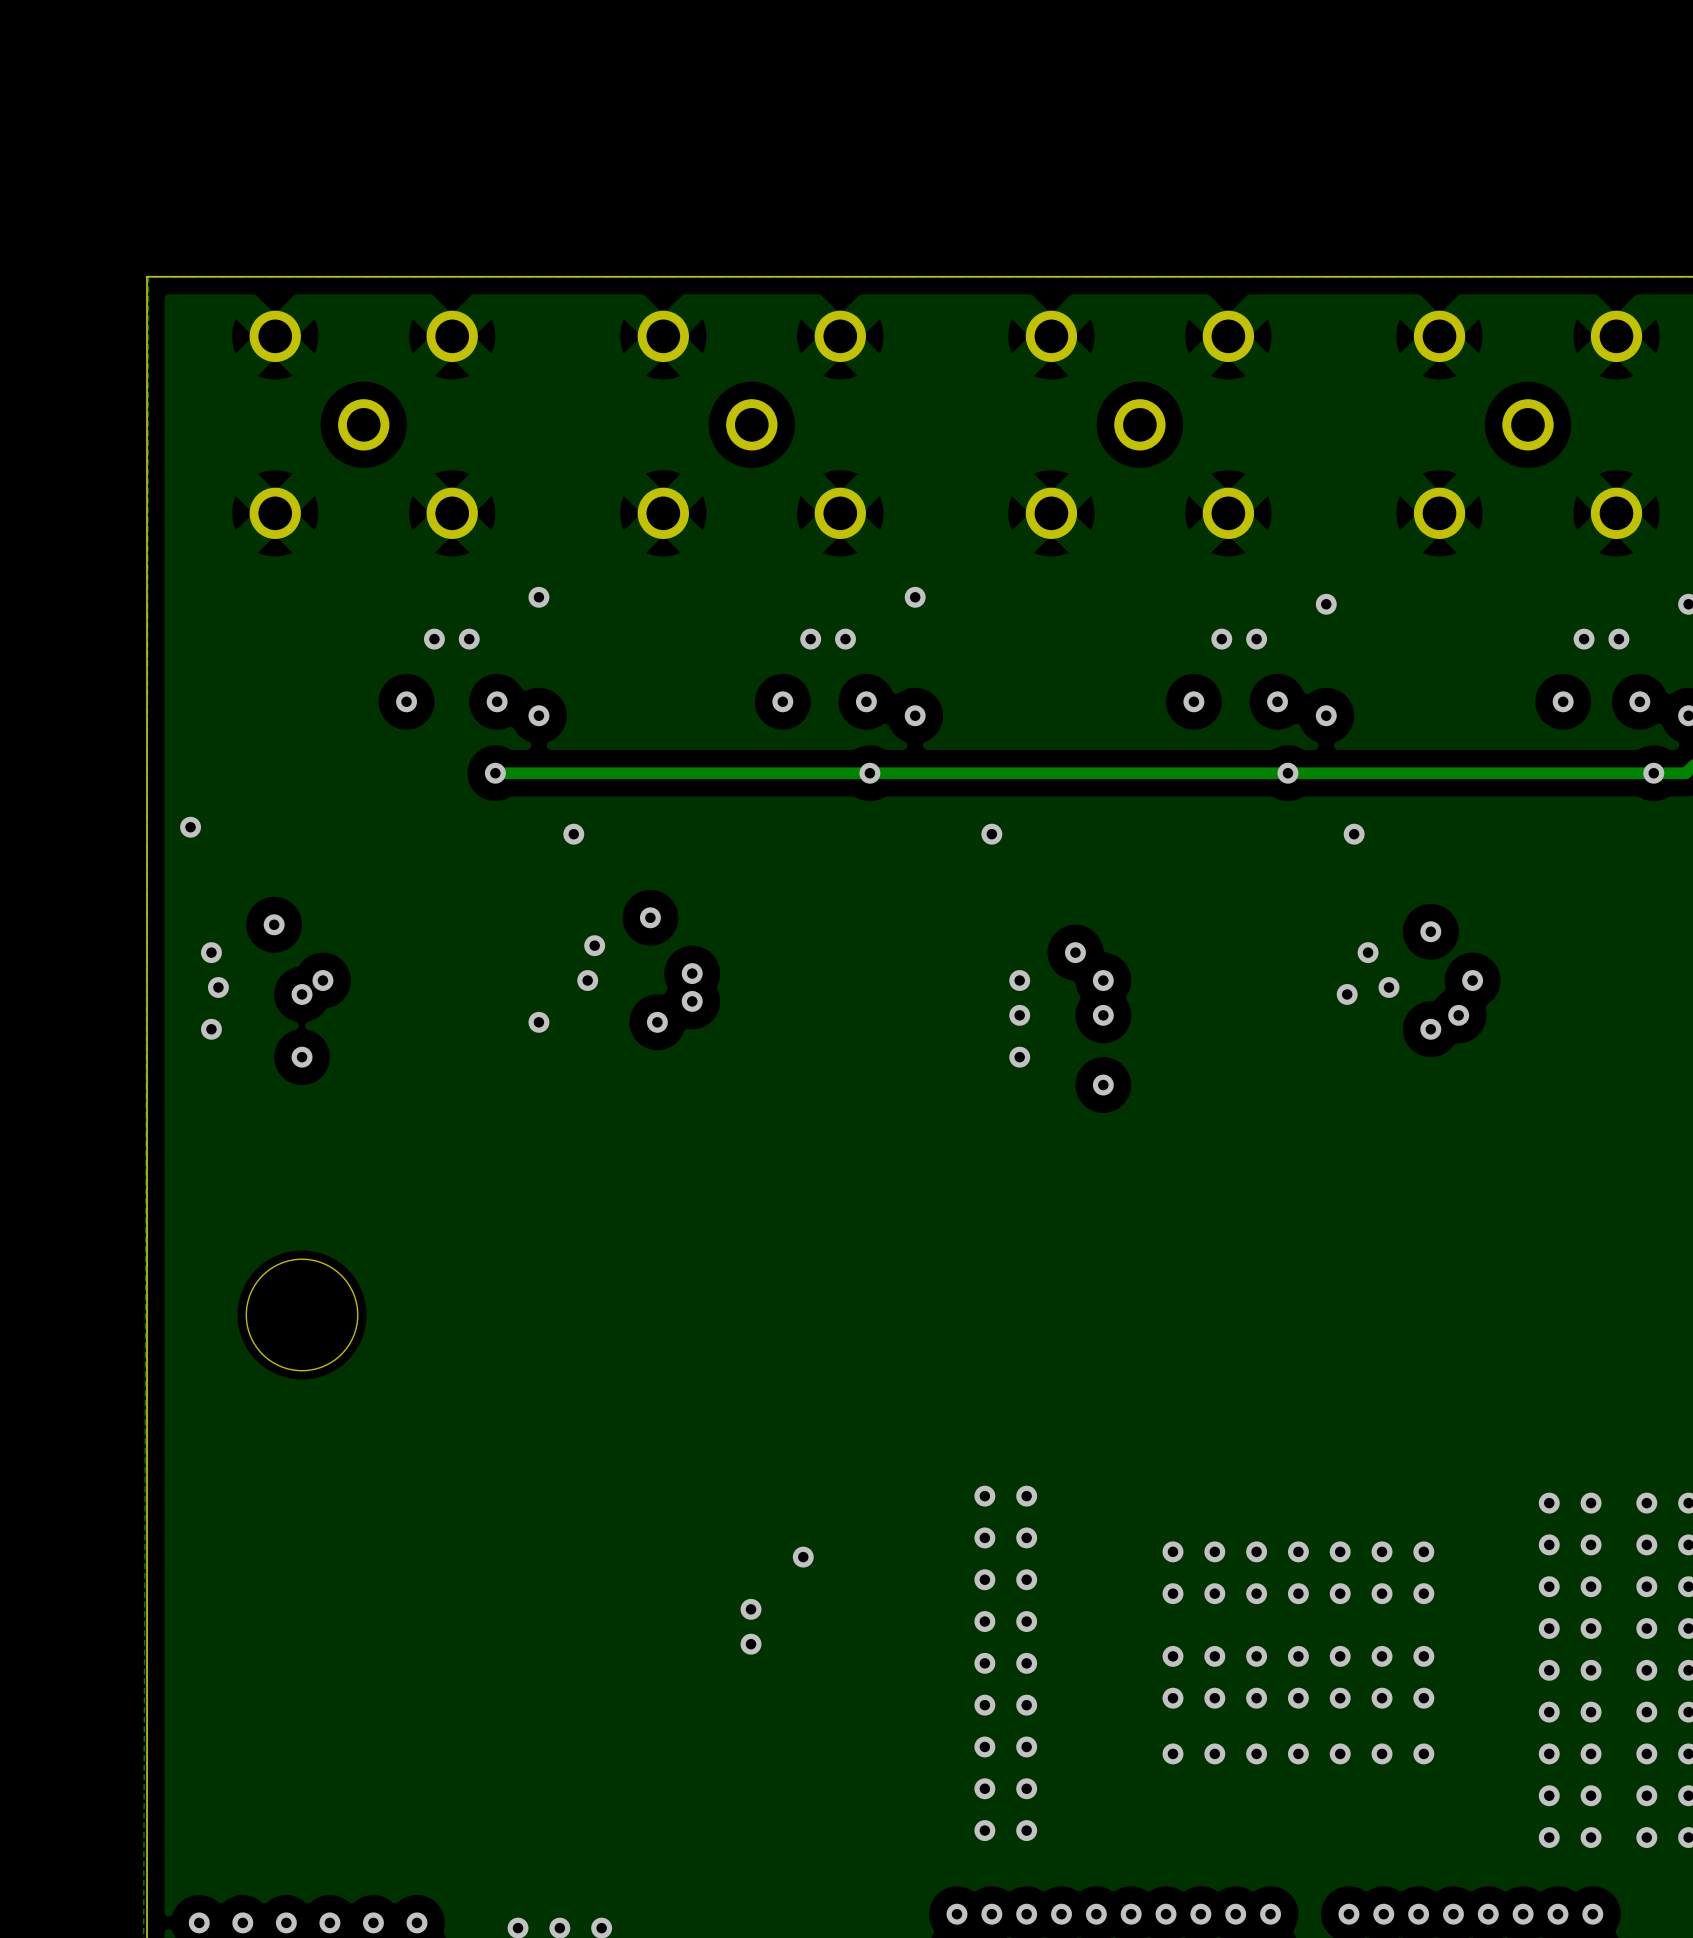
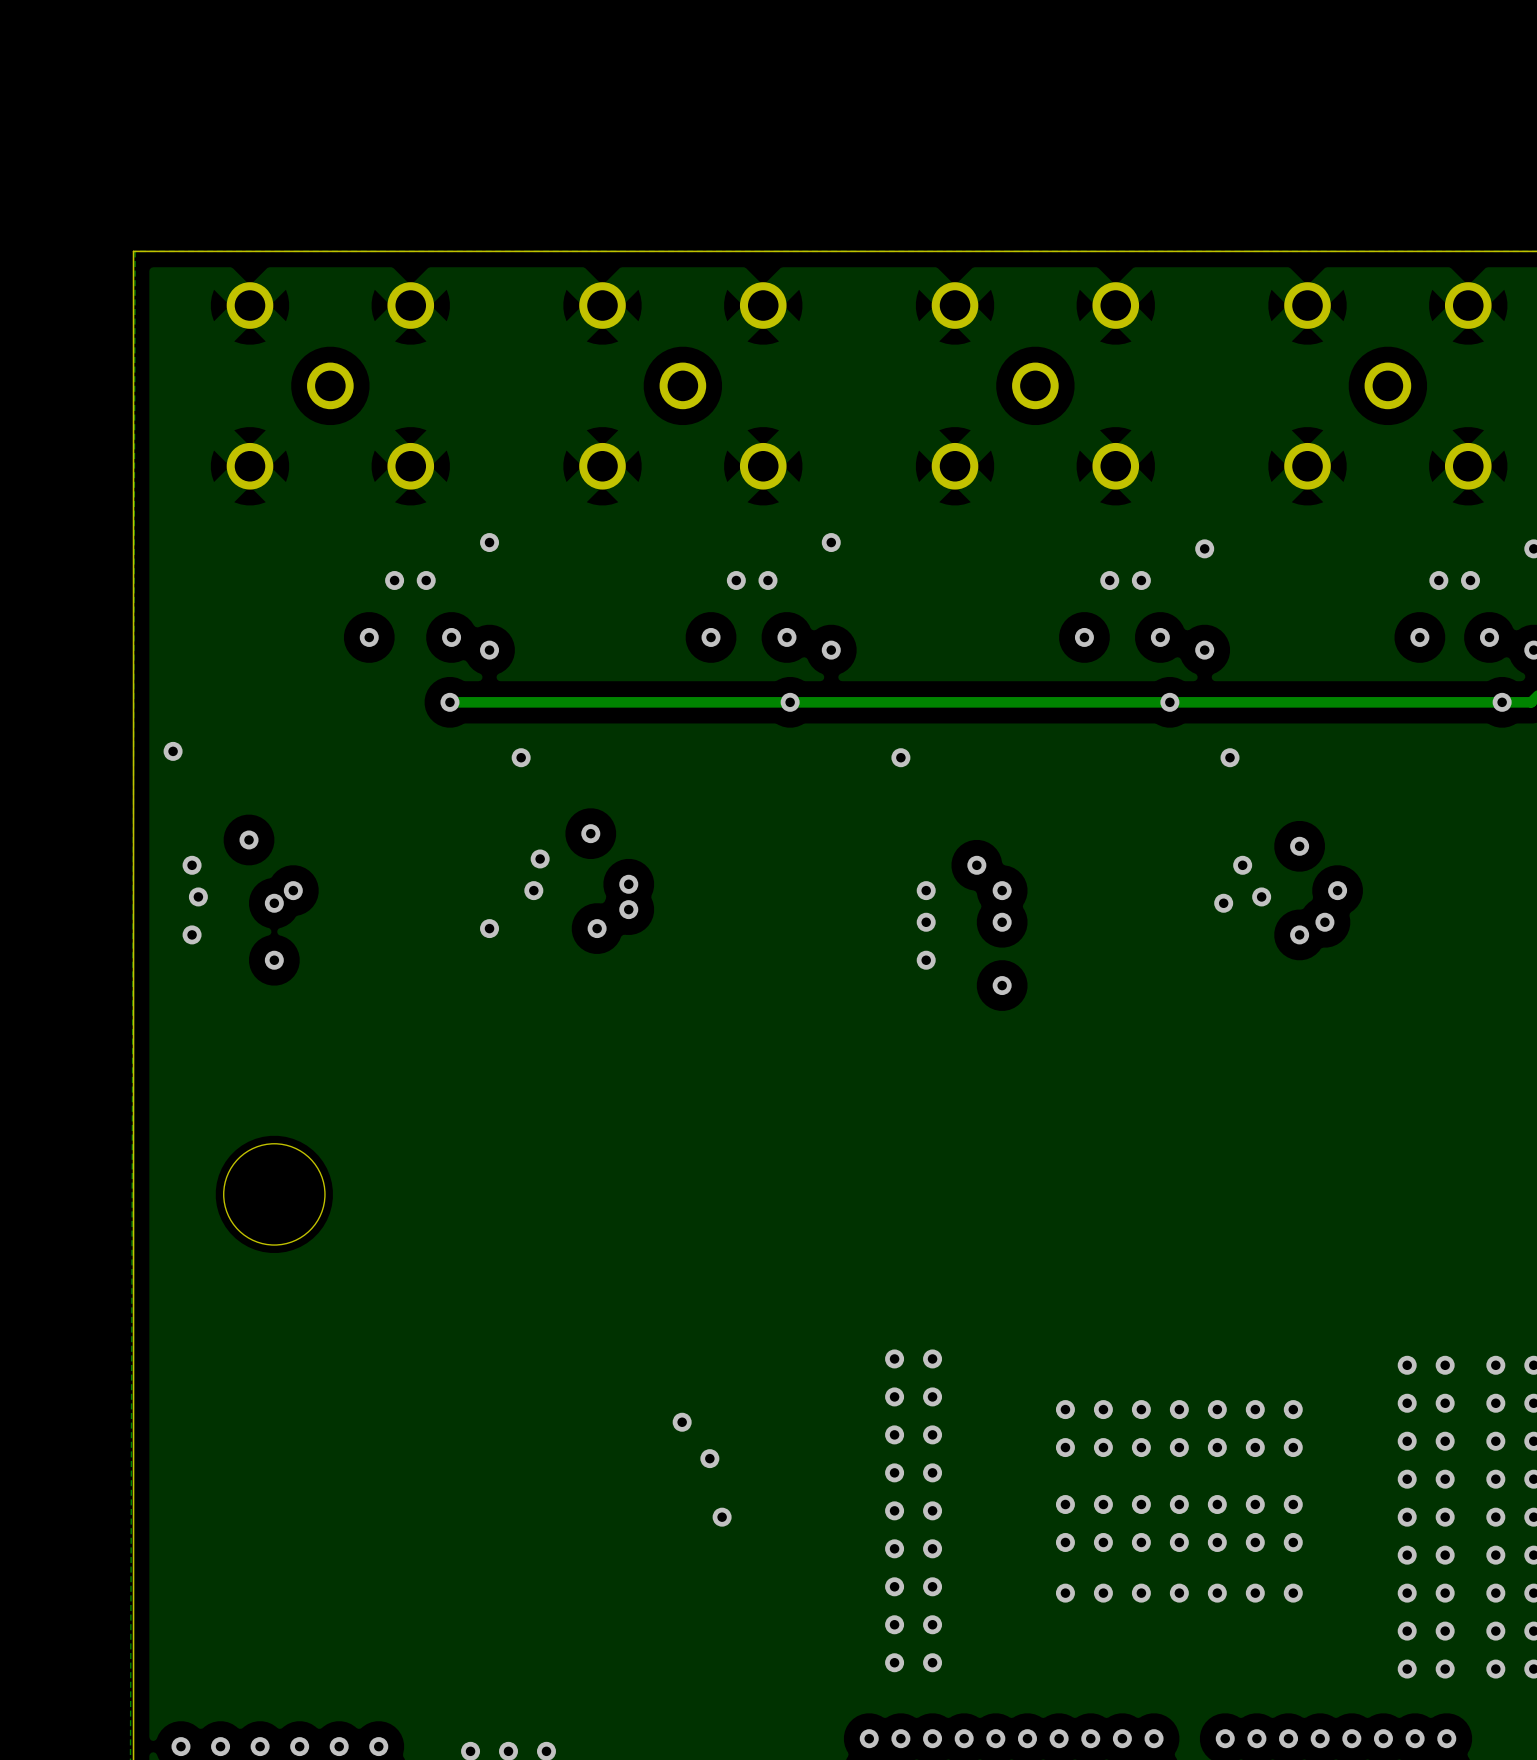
via: (803, 1557) -> none
via: none -> (682, 1422)
via: none -> (709, 1458)
via: (751, 1609) -> none
via: (751, 1644) -> none
via: none -> (722, 1517)

